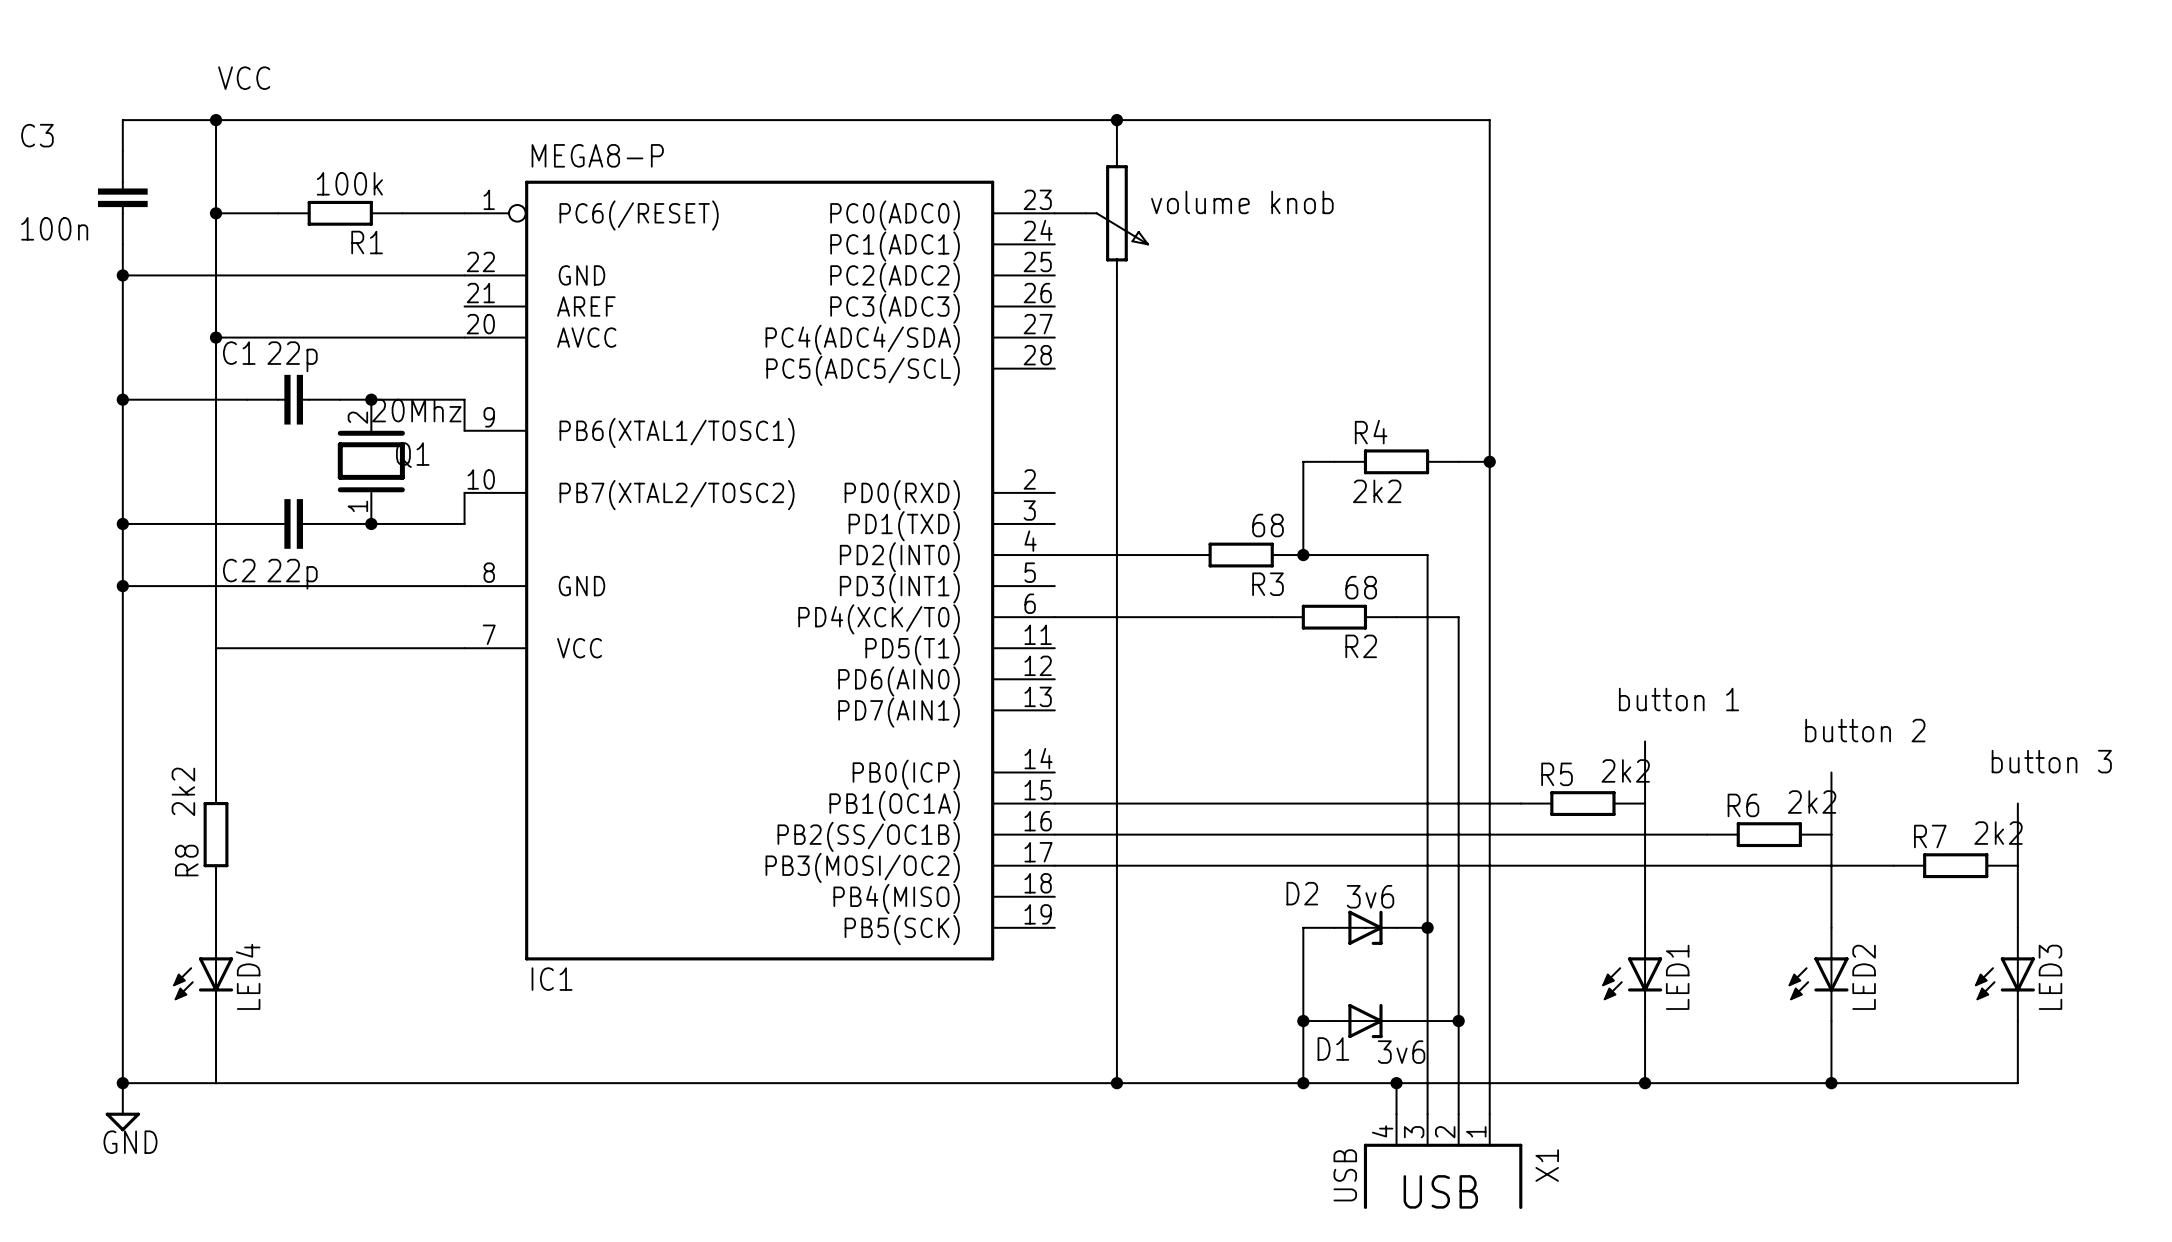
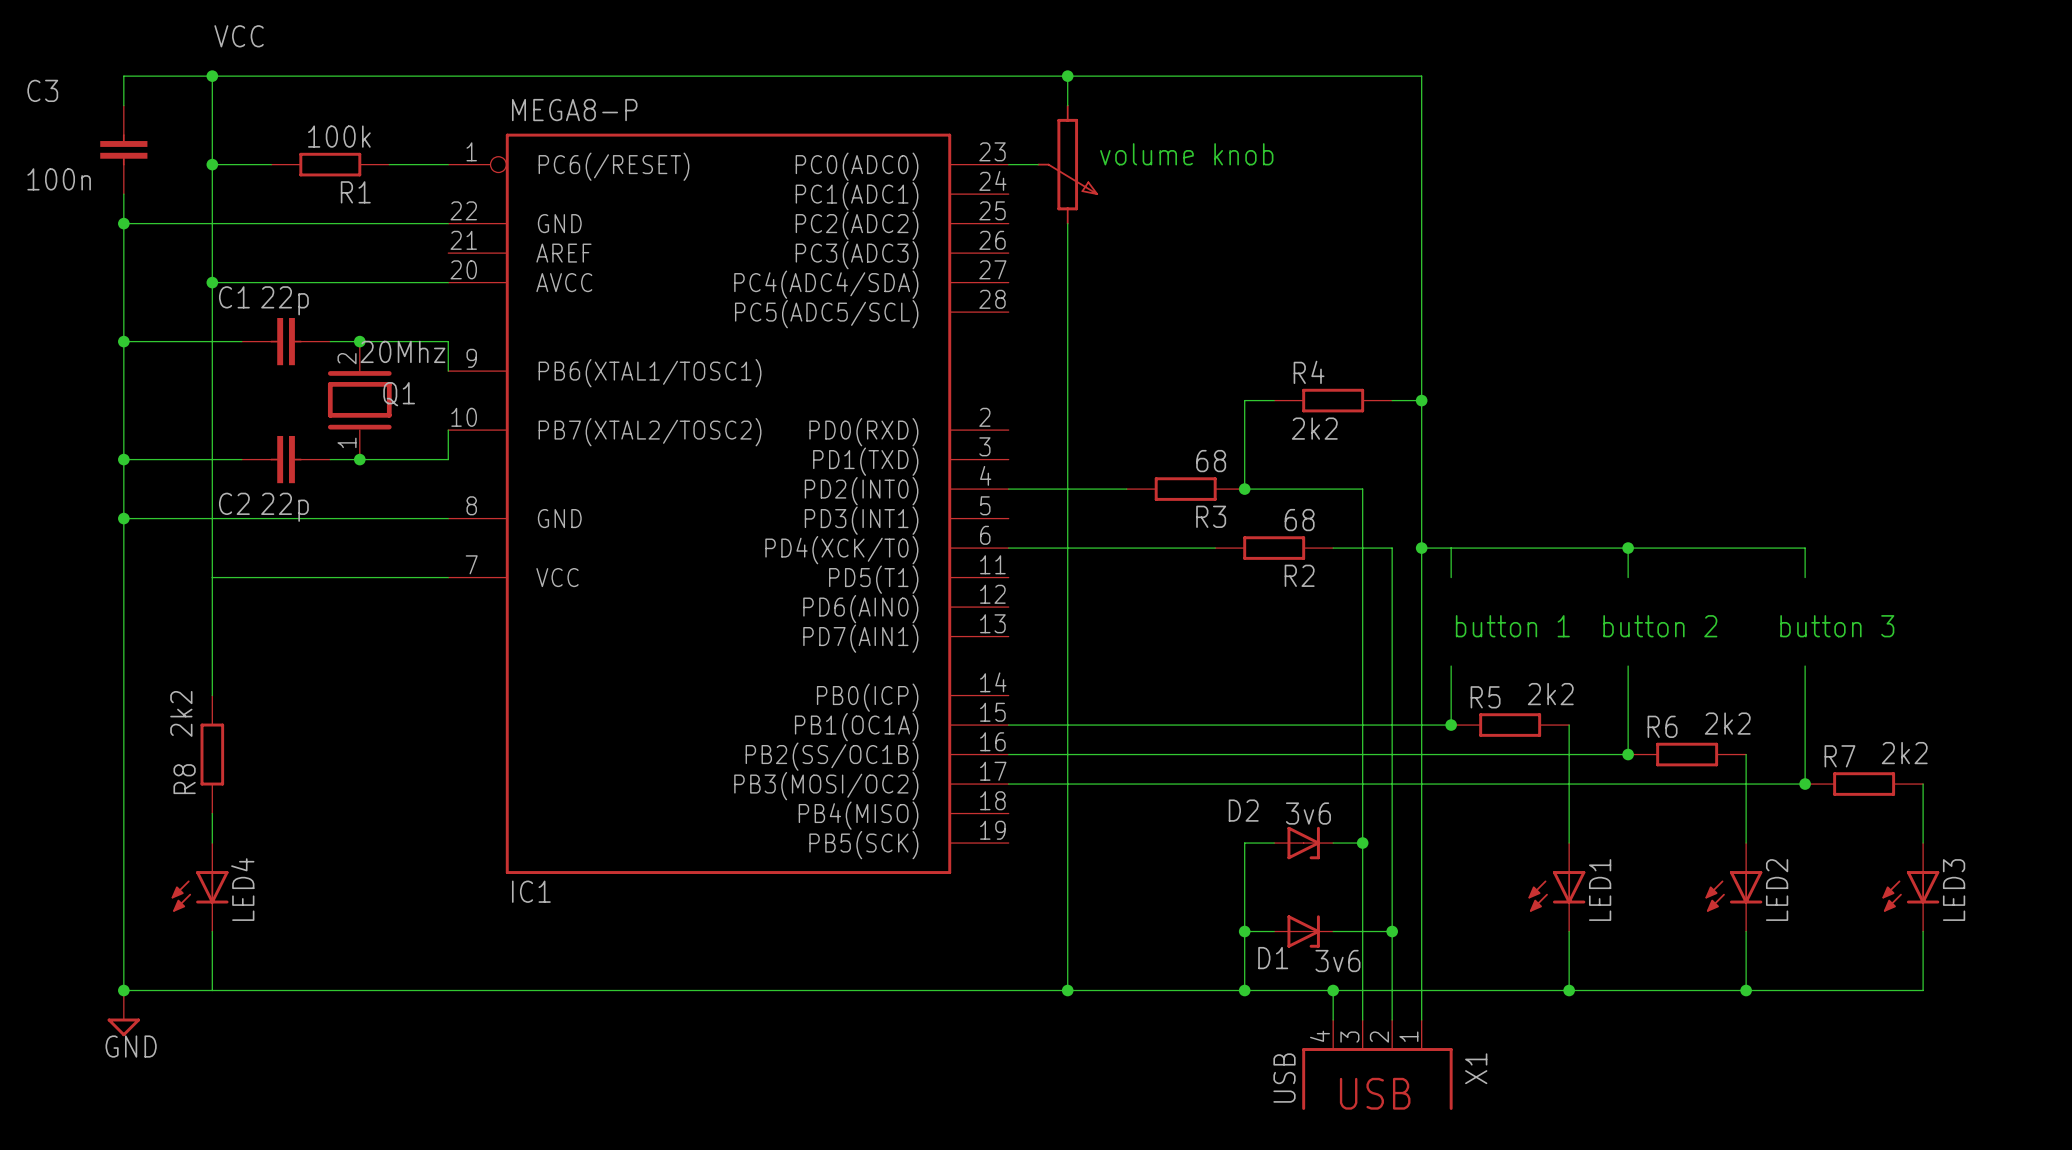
wire: none -> (1421, 548) (1805, 548) (1805, 577)
junction: none -> (1421, 548)
wire: none -> (1451, 548) (1451, 577)
wire: none -> (1628, 548) (1628, 577)
junction: none -> (1628, 548)
text position: button 1 (1678, 699) -> button 1 (1512, 626)
text position: button 2 (1865, 730) -> button 2 (1660, 626)
wire: (1645, 741) (1645, 803) -> (1451, 666) (1451, 725)
wire: none -> (1628, 666) (1628, 754)
wire: none -> (1805, 666) (1805, 784)
text position: button 3 (2051, 761) -> button 3 (1837, 626)
wire: (1831, 772) (1831, 834) -> none
junction: none -> (1451, 725)
wire: (2017, 803) (2017, 865) -> none
junction: none -> (1628, 754)
junction: none -> (1805, 784)

